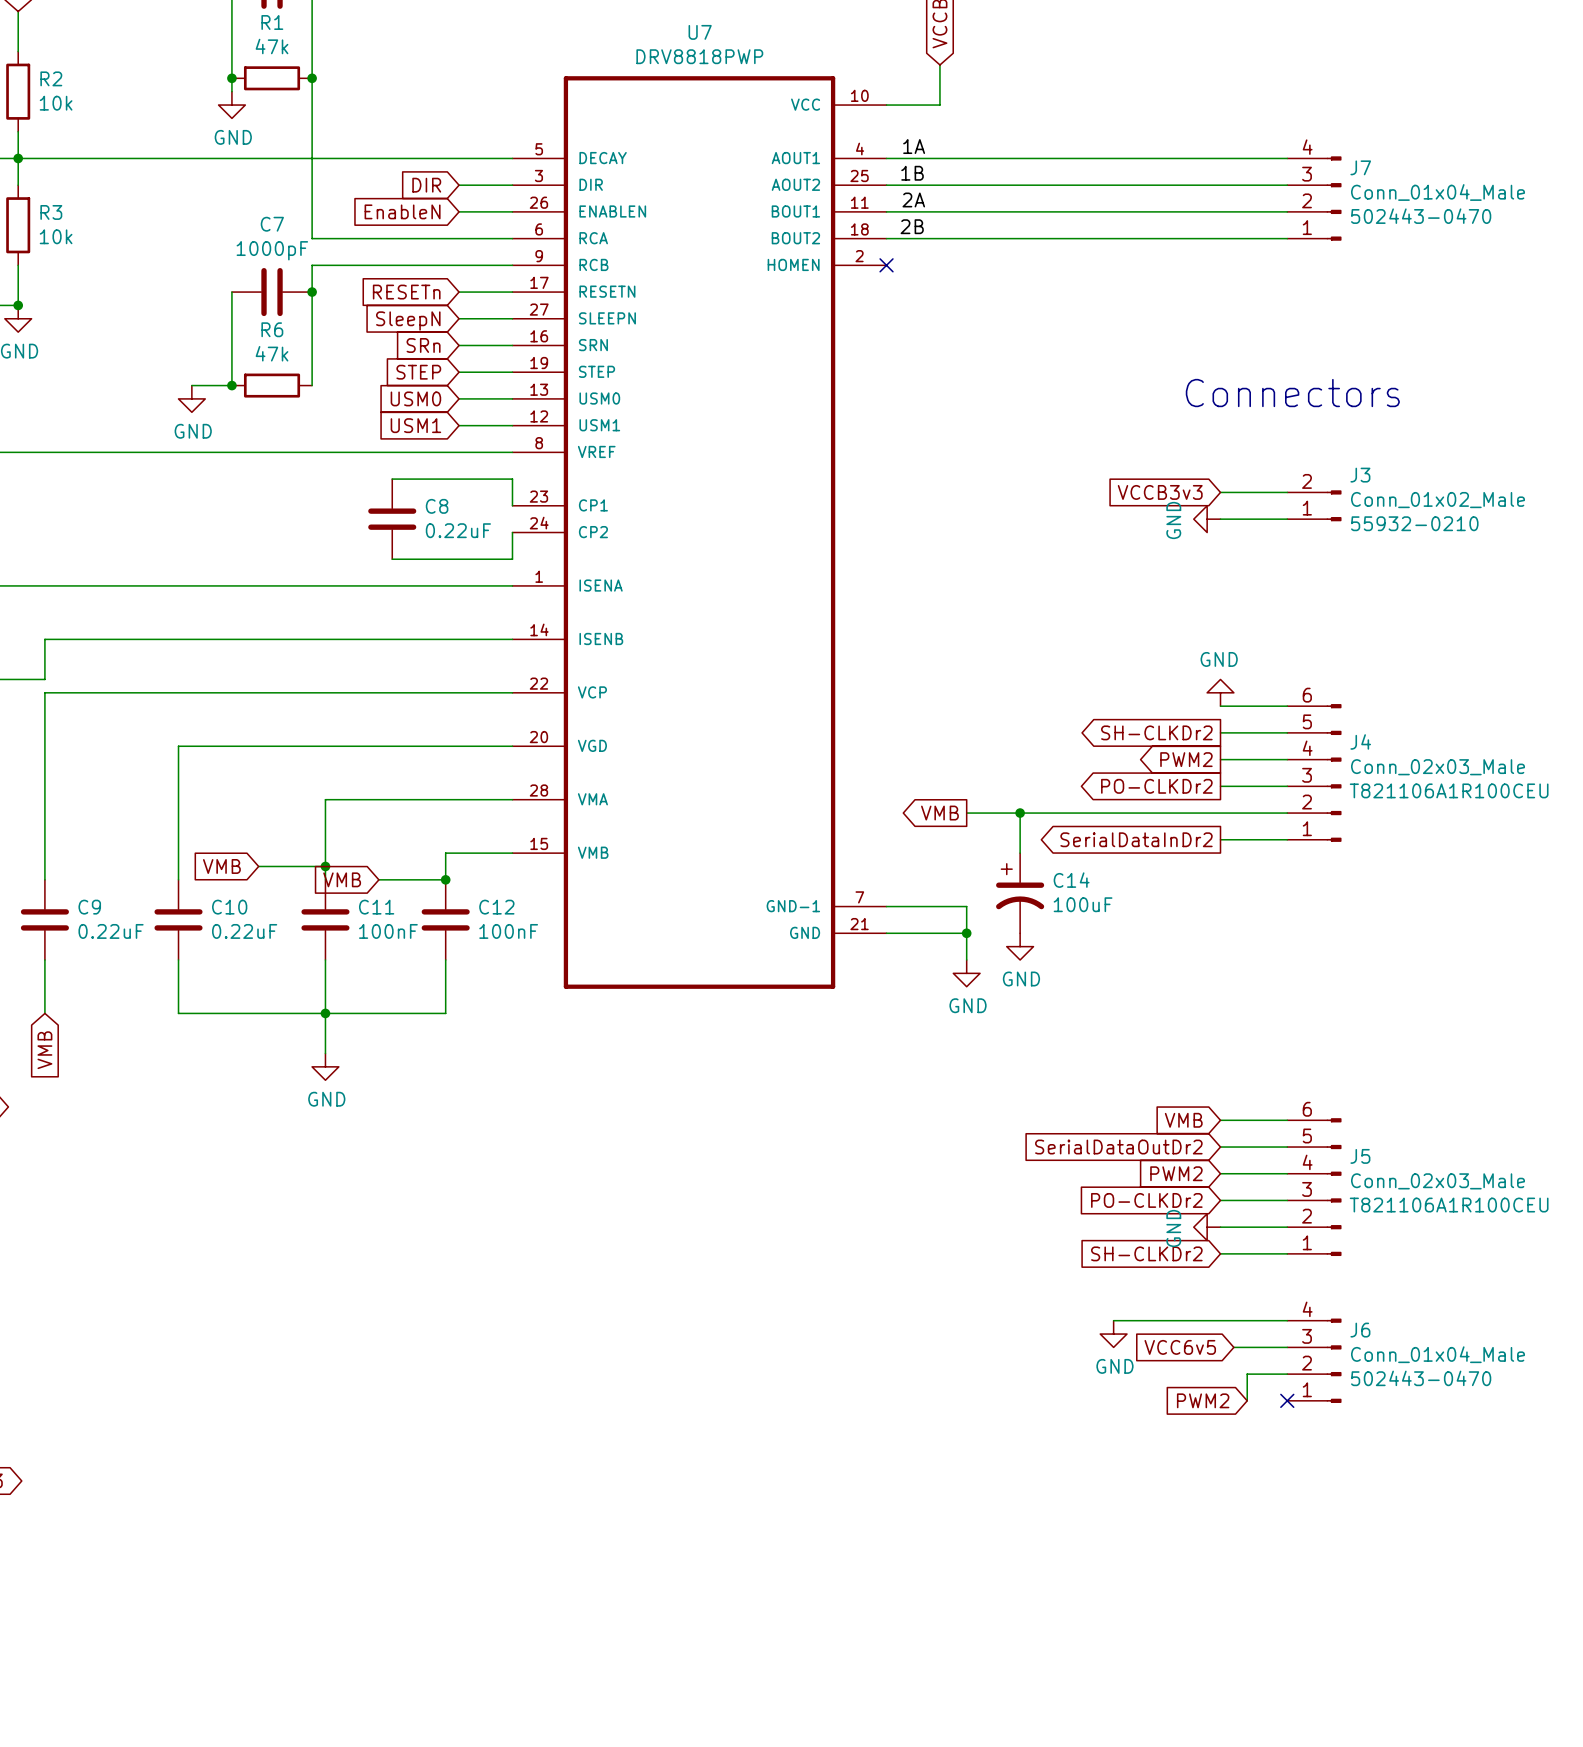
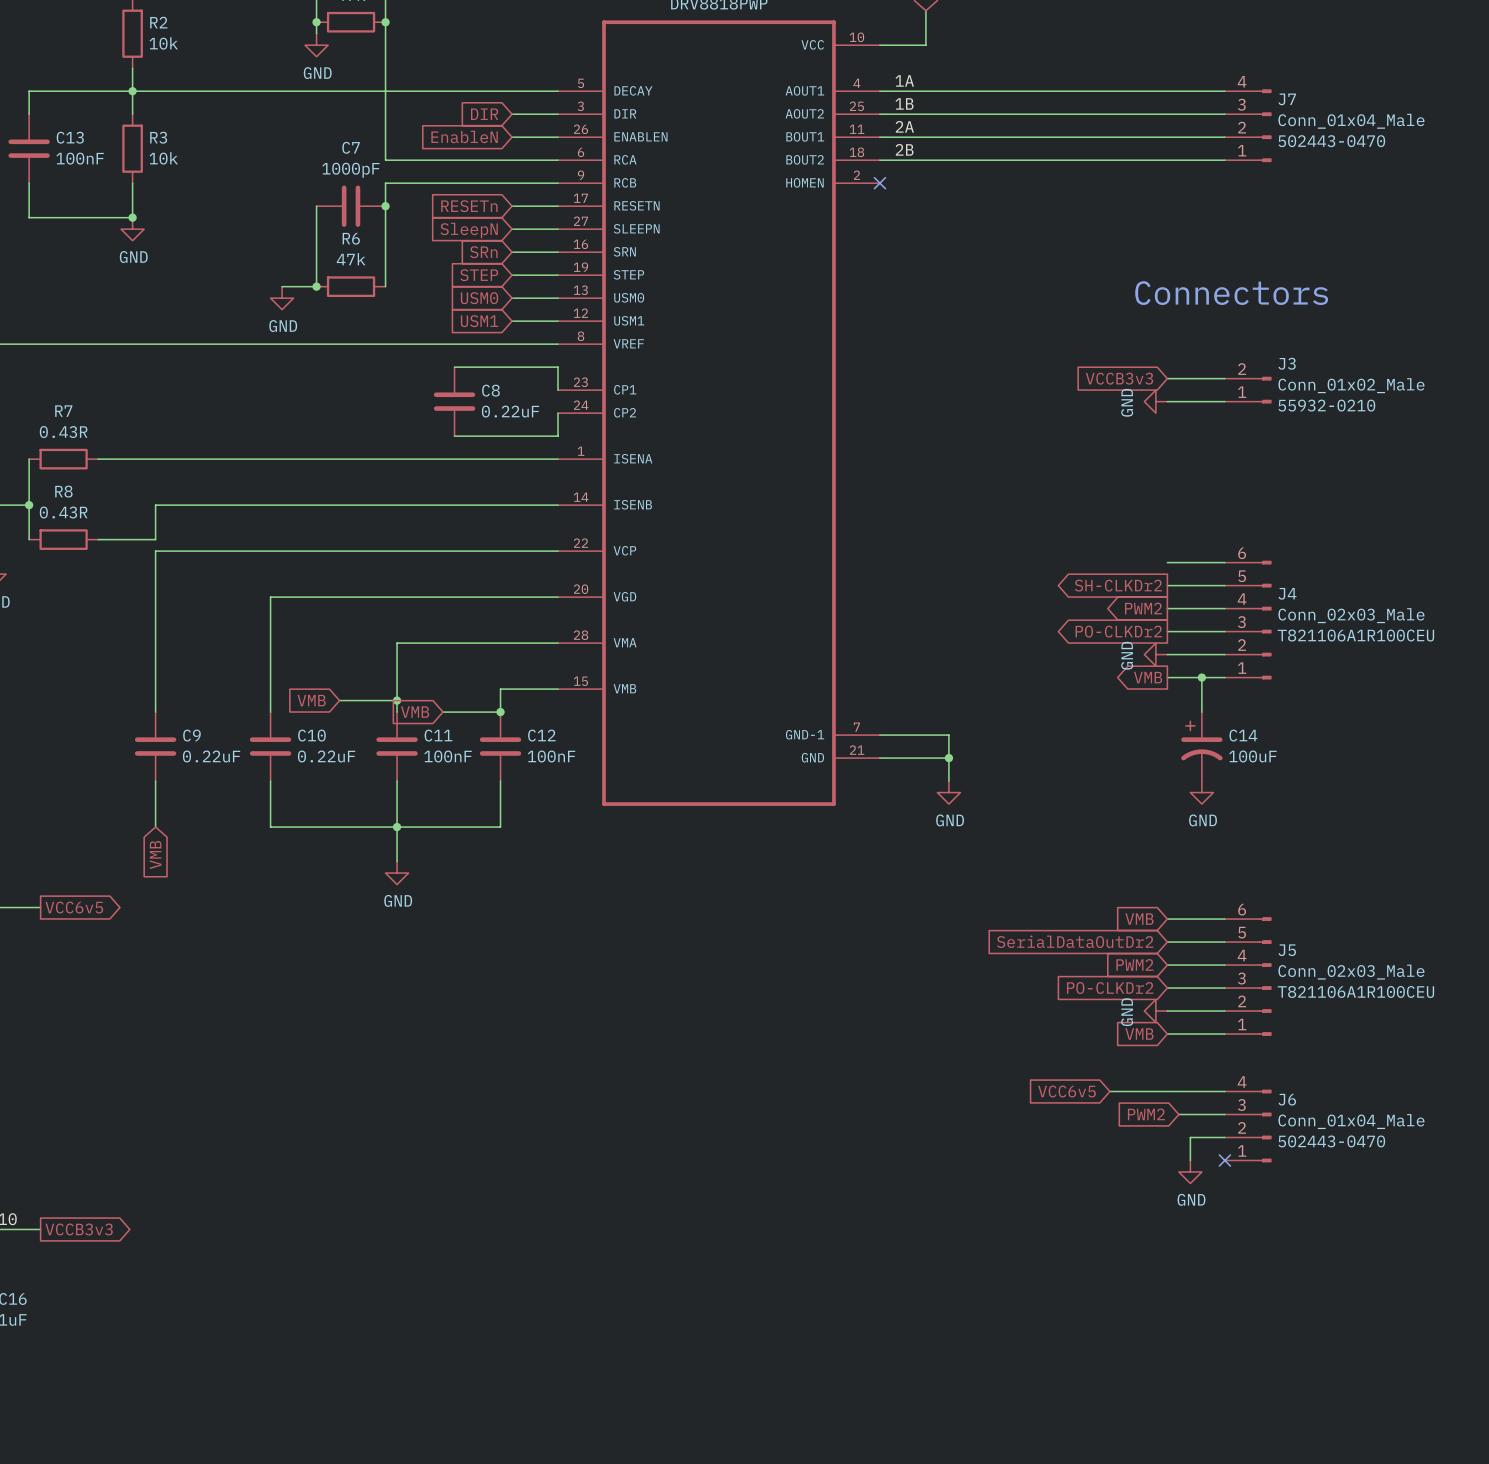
power symbol: GND (1220, 692) -> none
global label: VMB (939, 813) -> none
wire: (966, 813) (1220, 813) -> none
wire: (1020, 813) (1020, 853) -> (1201, 677) (1201, 712)
junction: (1020, 813) -> none
power symbol: none -> GND (1155, 654)
global label: SerialDataInDr2 (1136, 839) -> VMB (1148, 677)
junction: none -> (1201, 677)
C14 position: (1020, 893) -> (1201, 746)
power symbol: GND (1020, 946) -> none
power symbol: none -> GND (1201, 792)
global label: SH-CLKDr2 (1146, 1253) -> VMB (1139, 1034)
global label: none -> VCC6v5 (1067, 1091)
wire: (1113, 1320) (1153, 1320) -> none
power symbol position: GND (1113, 1334) -> GND (1190, 1171)
global label: VCC6v5 (1180, 1347) -> PWM2 (1146, 1114)
global label: PWM2 (1203, 1400) -> none

